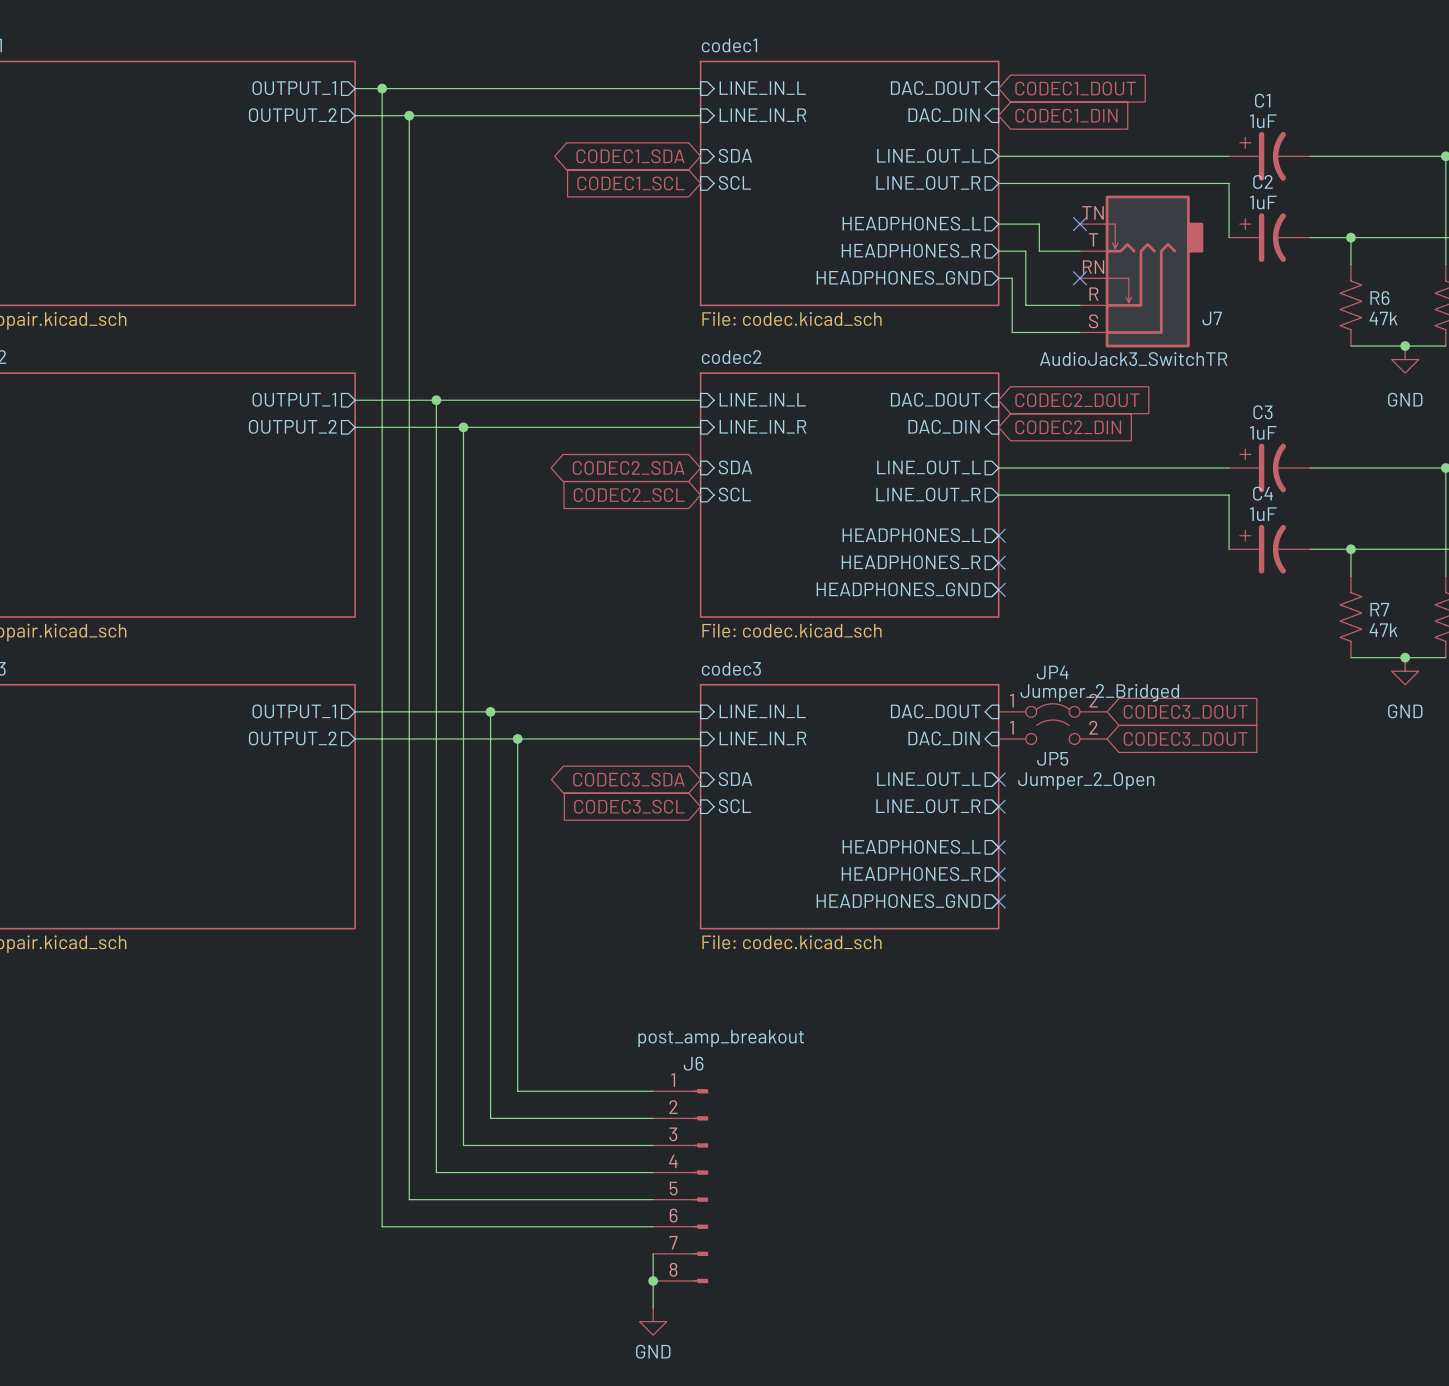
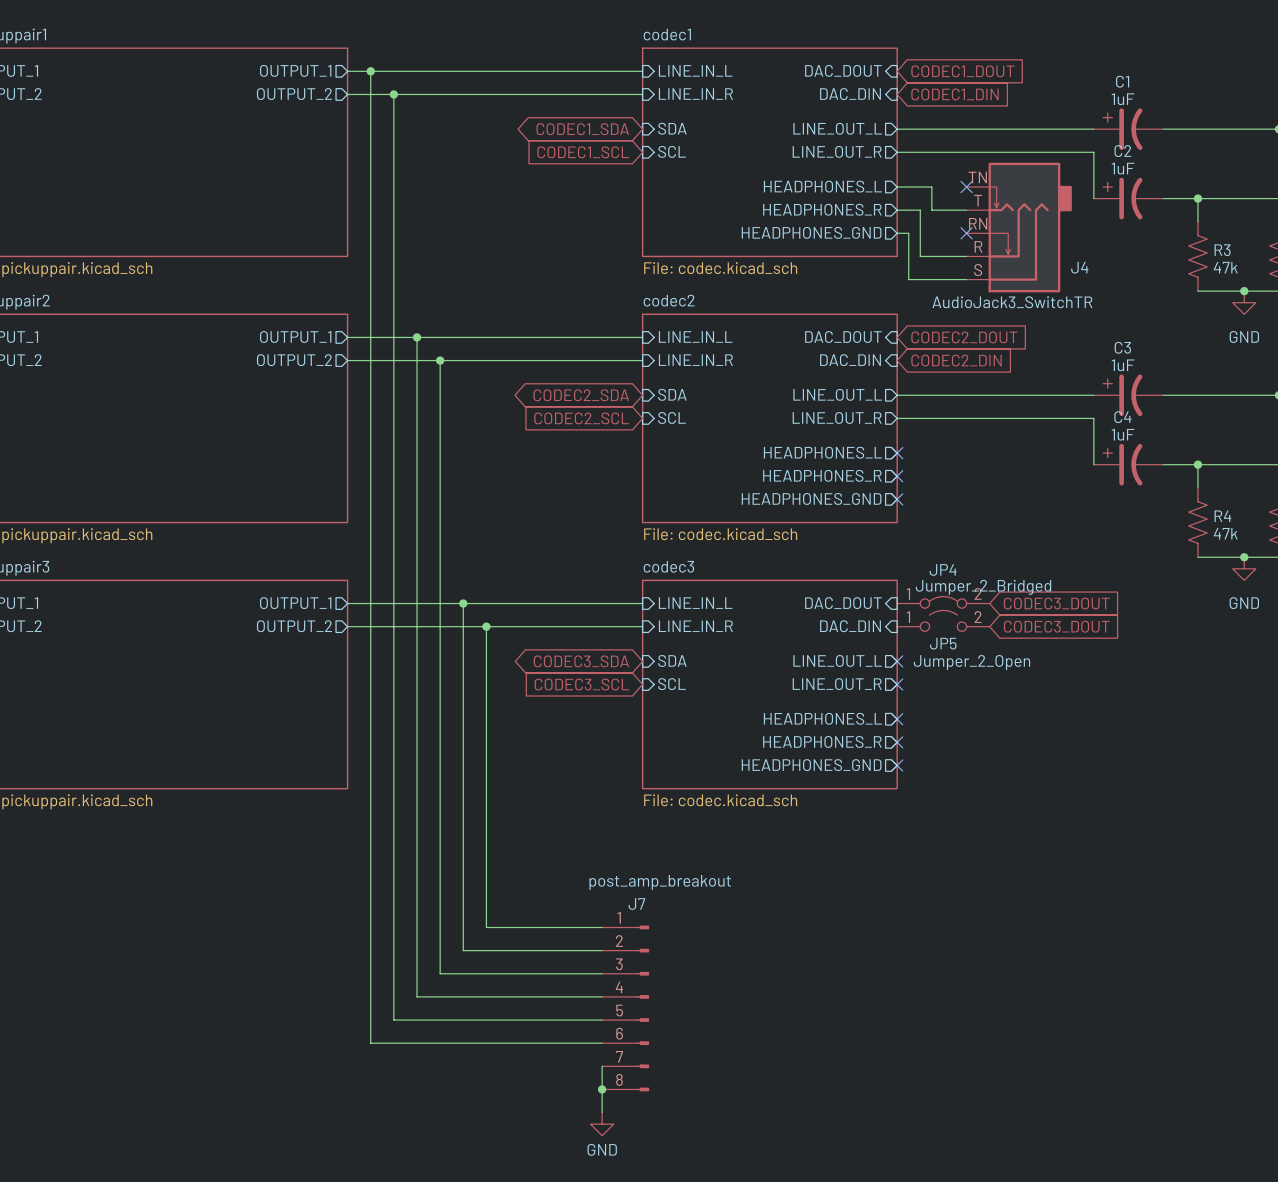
R6 name: R6 (1379, 297) -> R3 (1222, 250)
J7 name: J7 (1212, 318) -> J4 (1079, 267)
R7 name: R7 (1379, 609) -> R4 (1222, 516)
J6 name: J6 (693, 1063) -> J7 (636, 903)

